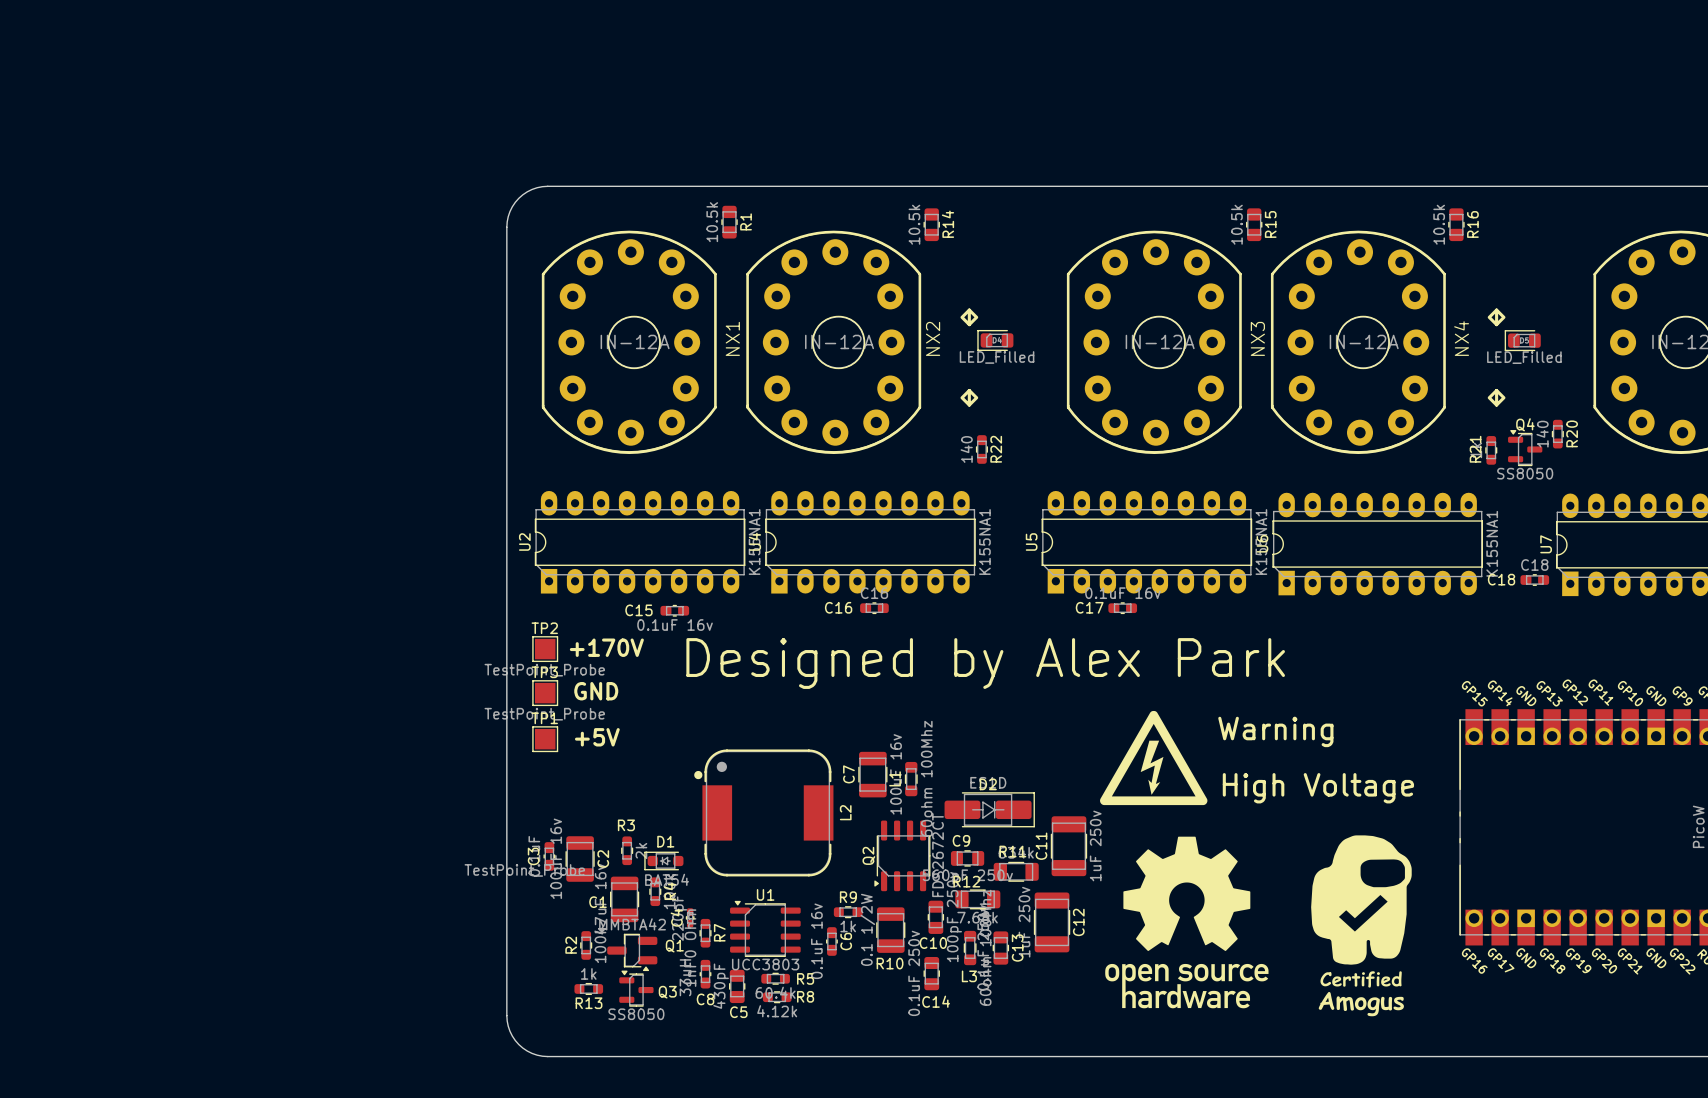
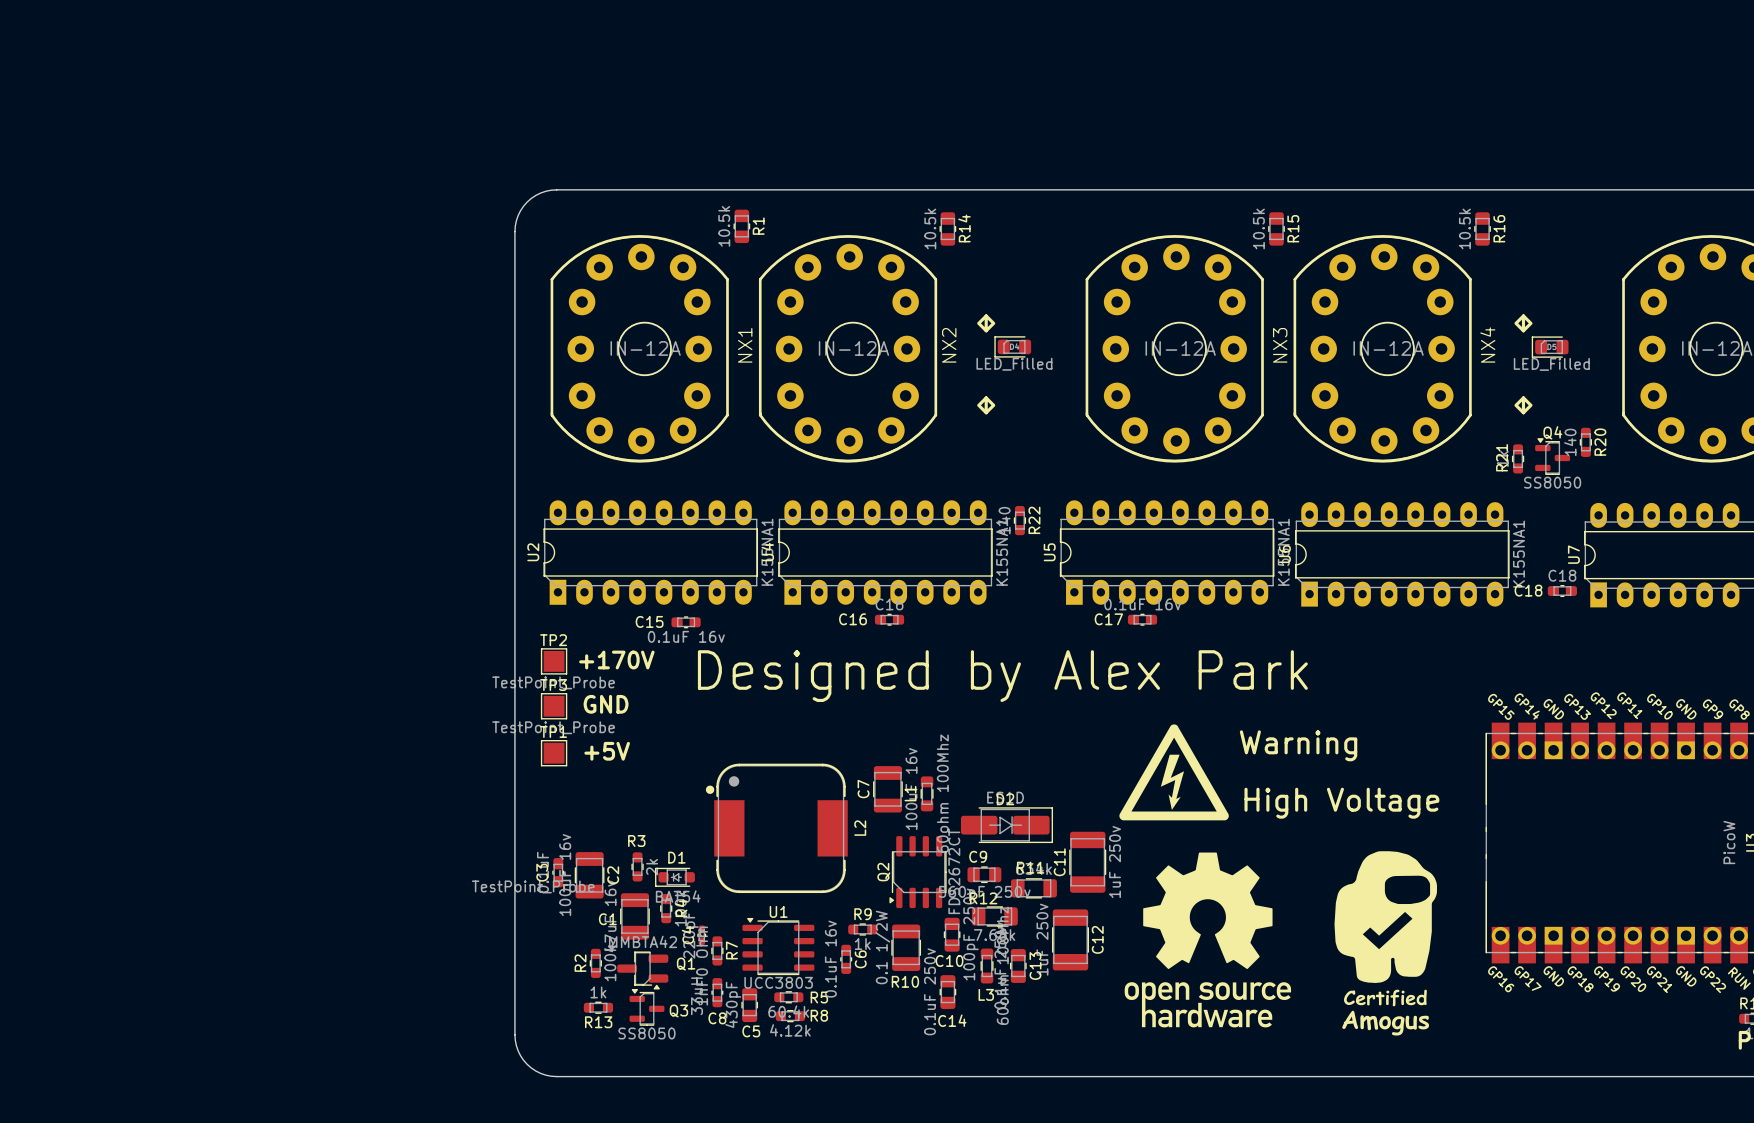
R22 position: (981, 449) -> (1019, 520)

